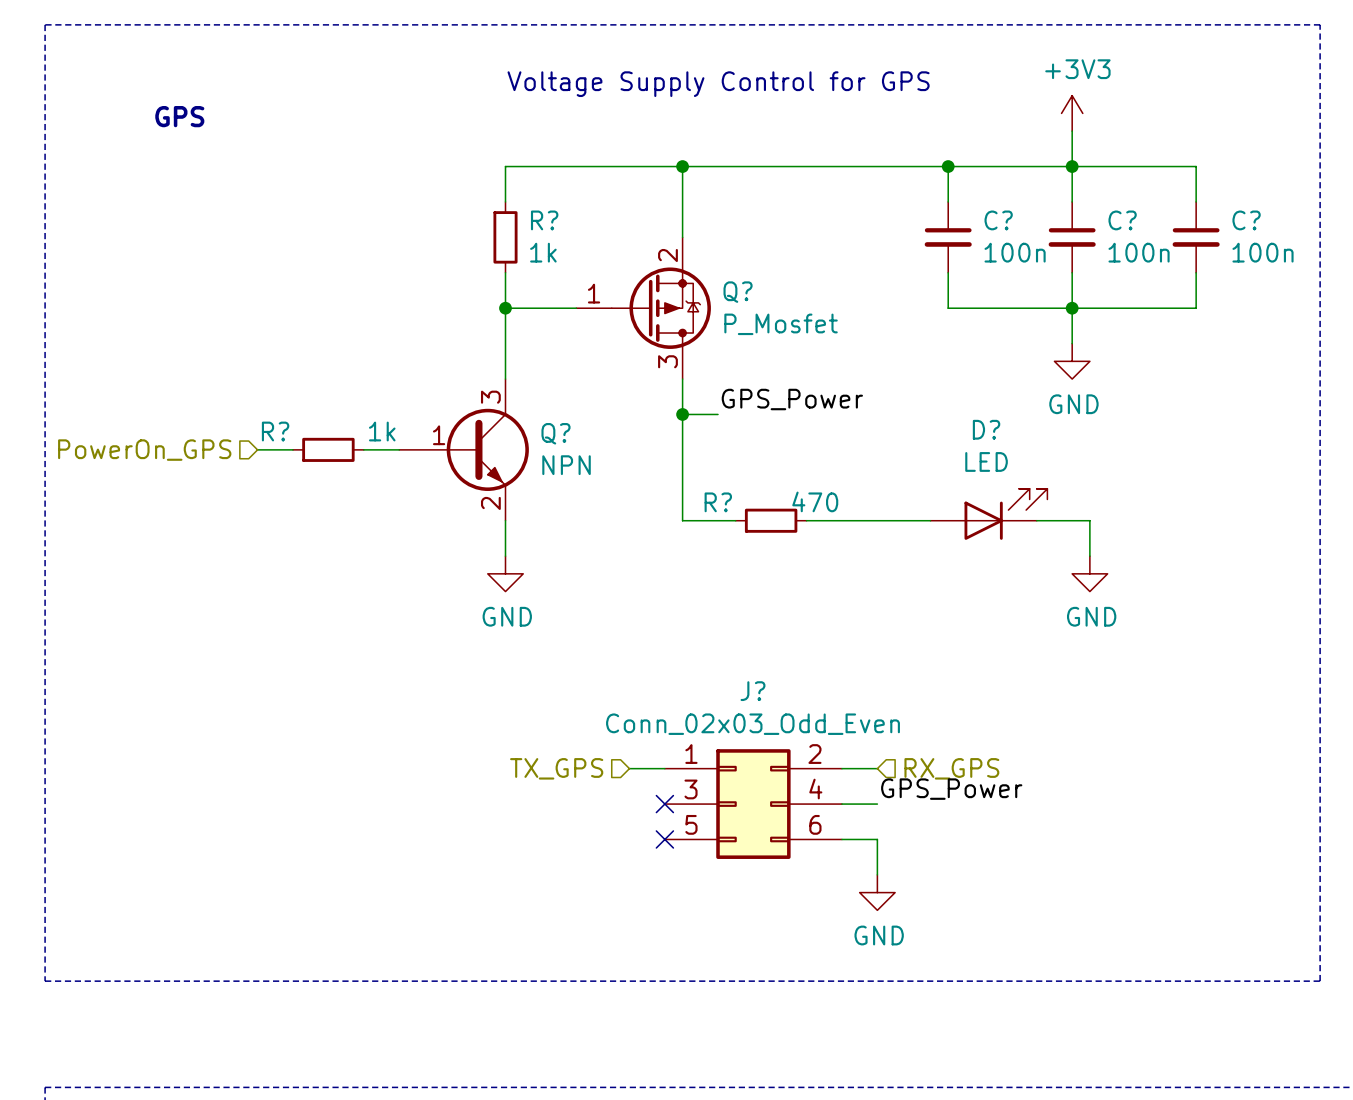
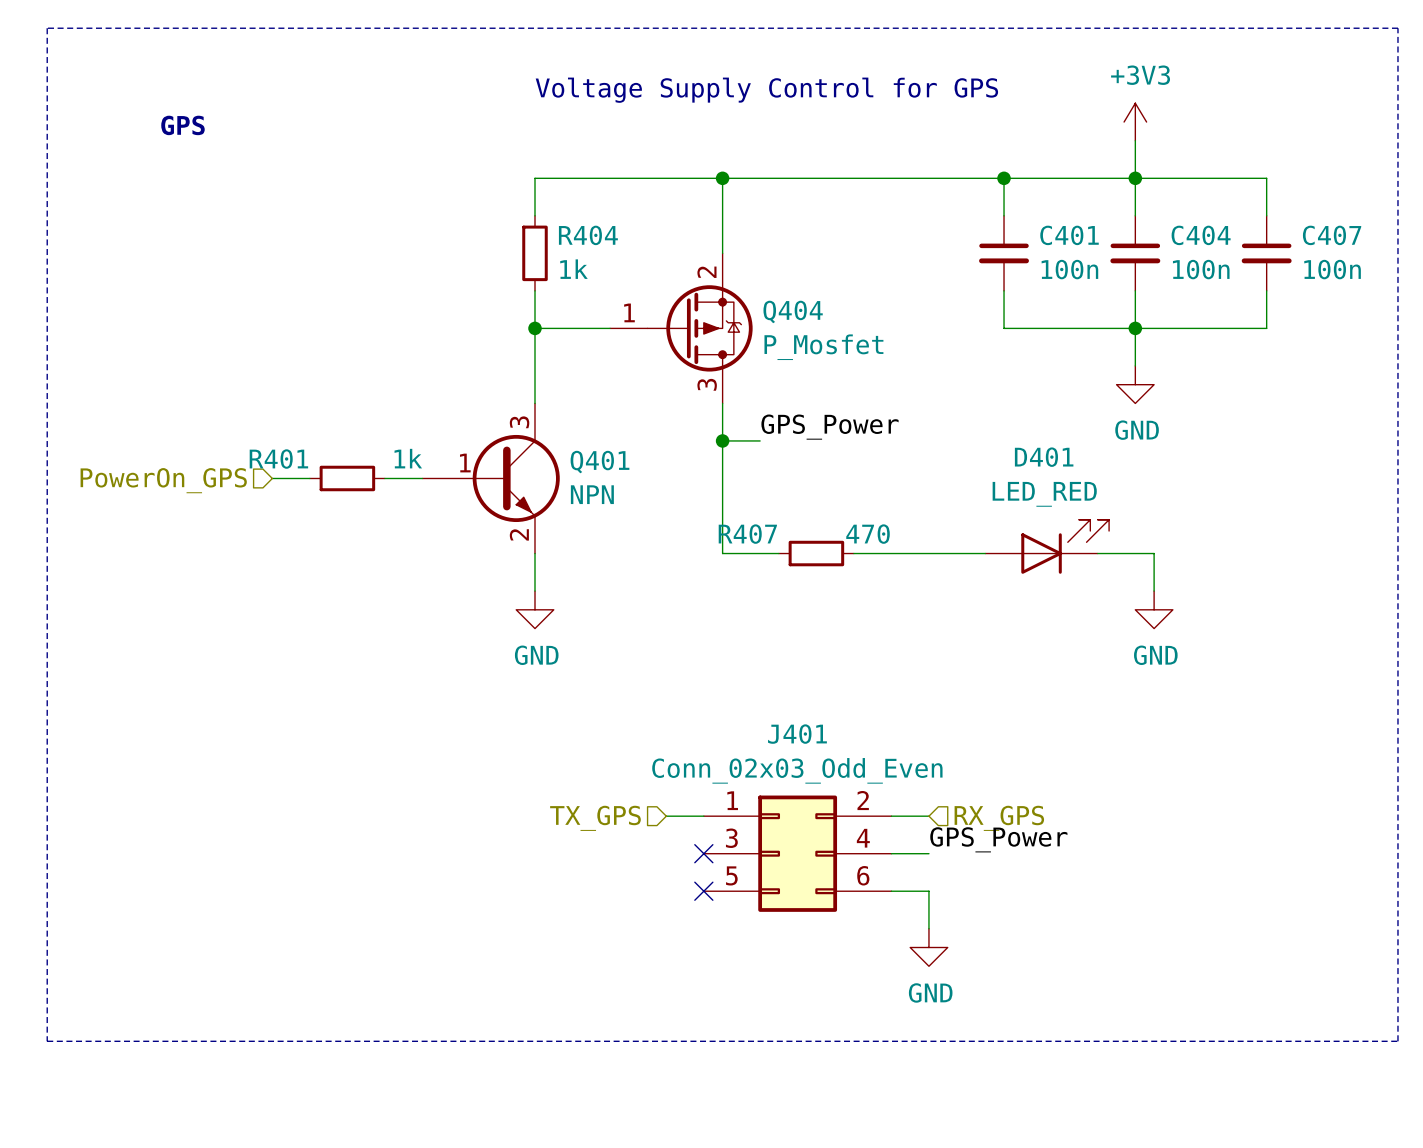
R? name: R? (544, 220) -> R404 (588, 235)
C? name: C? (998, 220) -> C401 (1069, 235)
C? name: C? (1122, 220) -> C404 (1201, 235)
C? name: C? (1246, 220) -> C407 (1332, 235)
Q? name: Q? (738, 292) -> Q404 (793, 311)
D? name: D? (986, 429) -> D401 (1044, 457)
R? name: R? (275, 431) -> R401 (278, 459)
Q? name: Q? (555, 433) -> Q401 (599, 462)
D? value: LED (986, 461) -> LED_RED (1044, 494)
R? name: R? (718, 502) -> R407 (747, 534)
J? name: J? (753, 691) -> J401 (797, 734)

